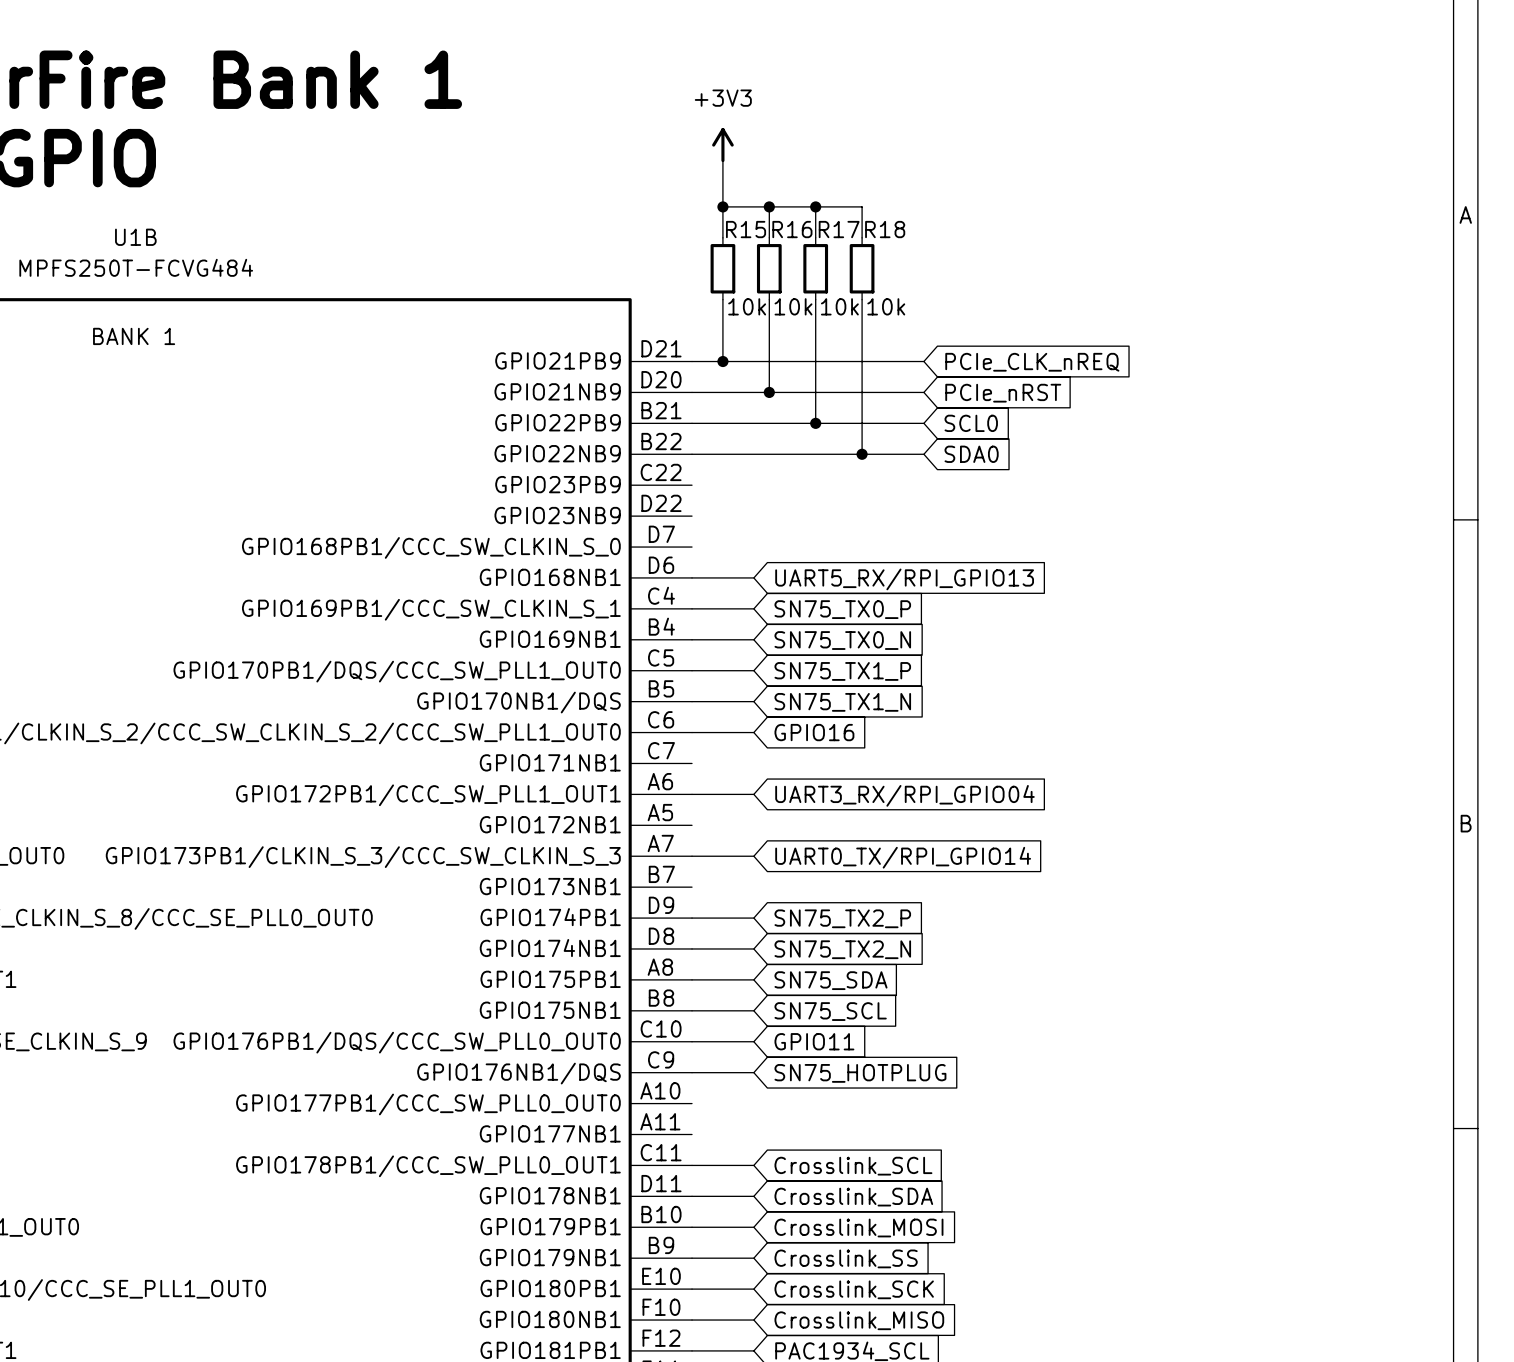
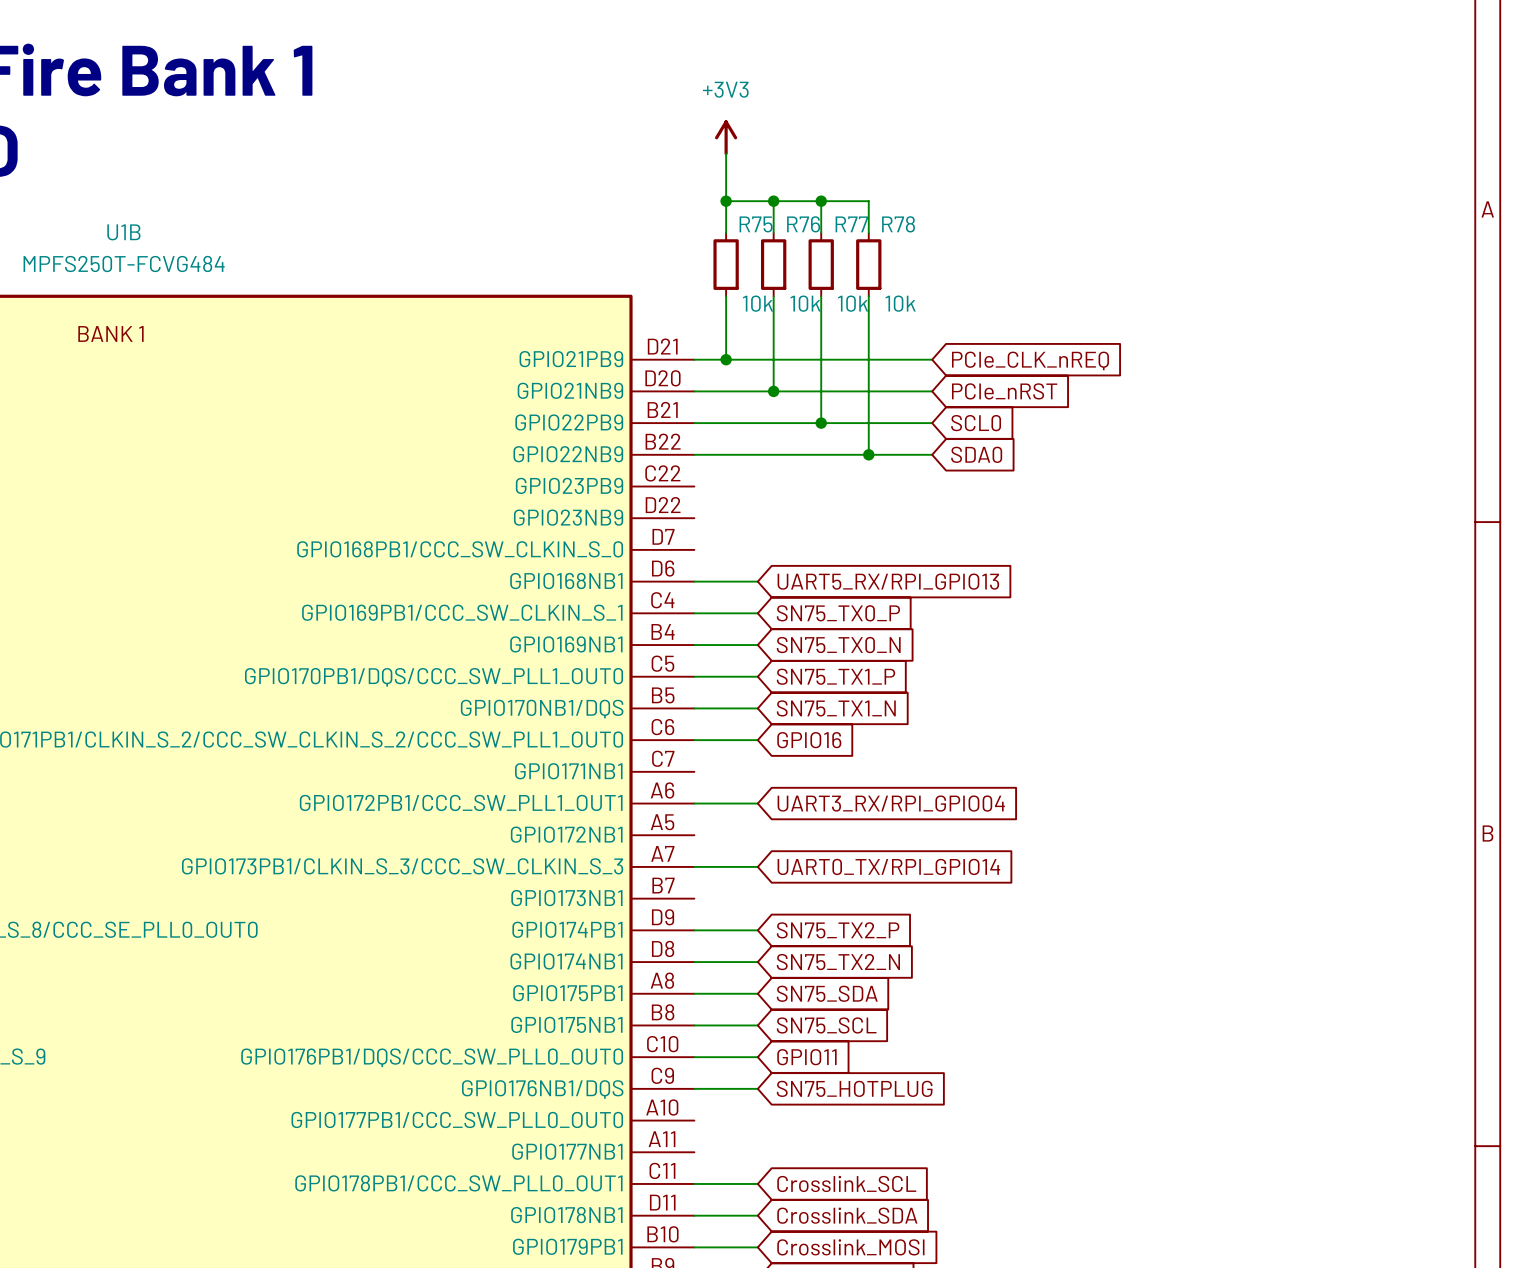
R15 name: R15 (746, 229) -> R75 (756, 224)
R16 name: R16 (792, 229) -> R76 (803, 224)
R17 name: R17 (839, 229) -> R77 (851, 224)
R18 name: R18 (885, 229) -> R78 (898, 224)

